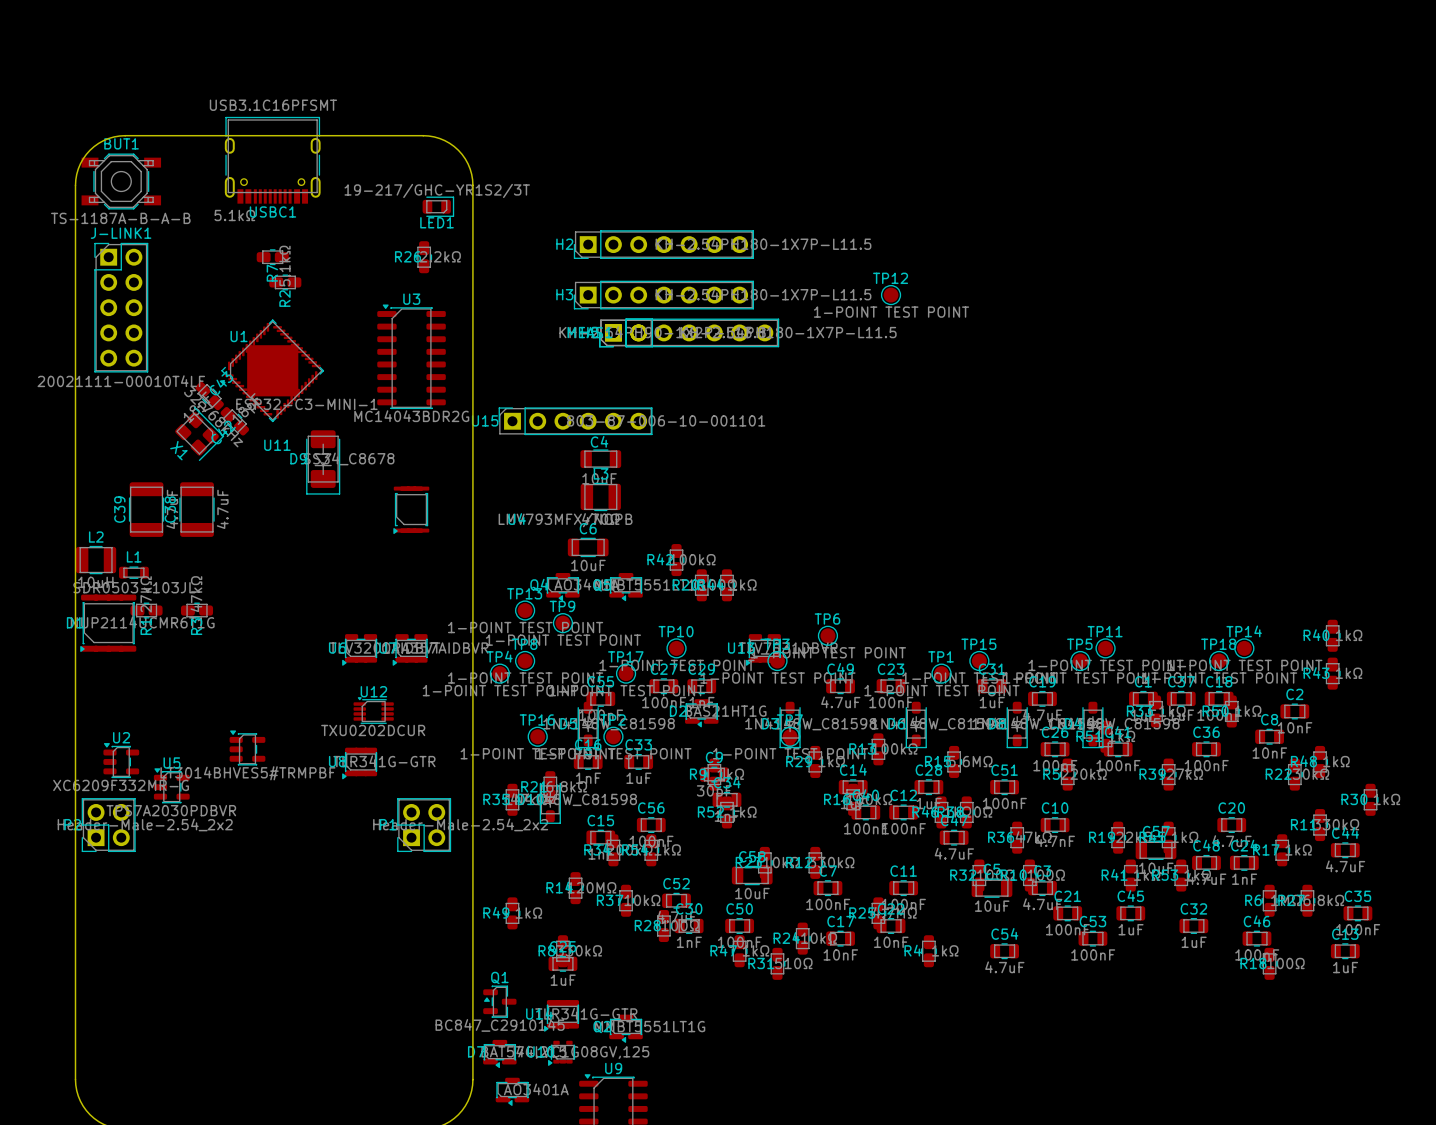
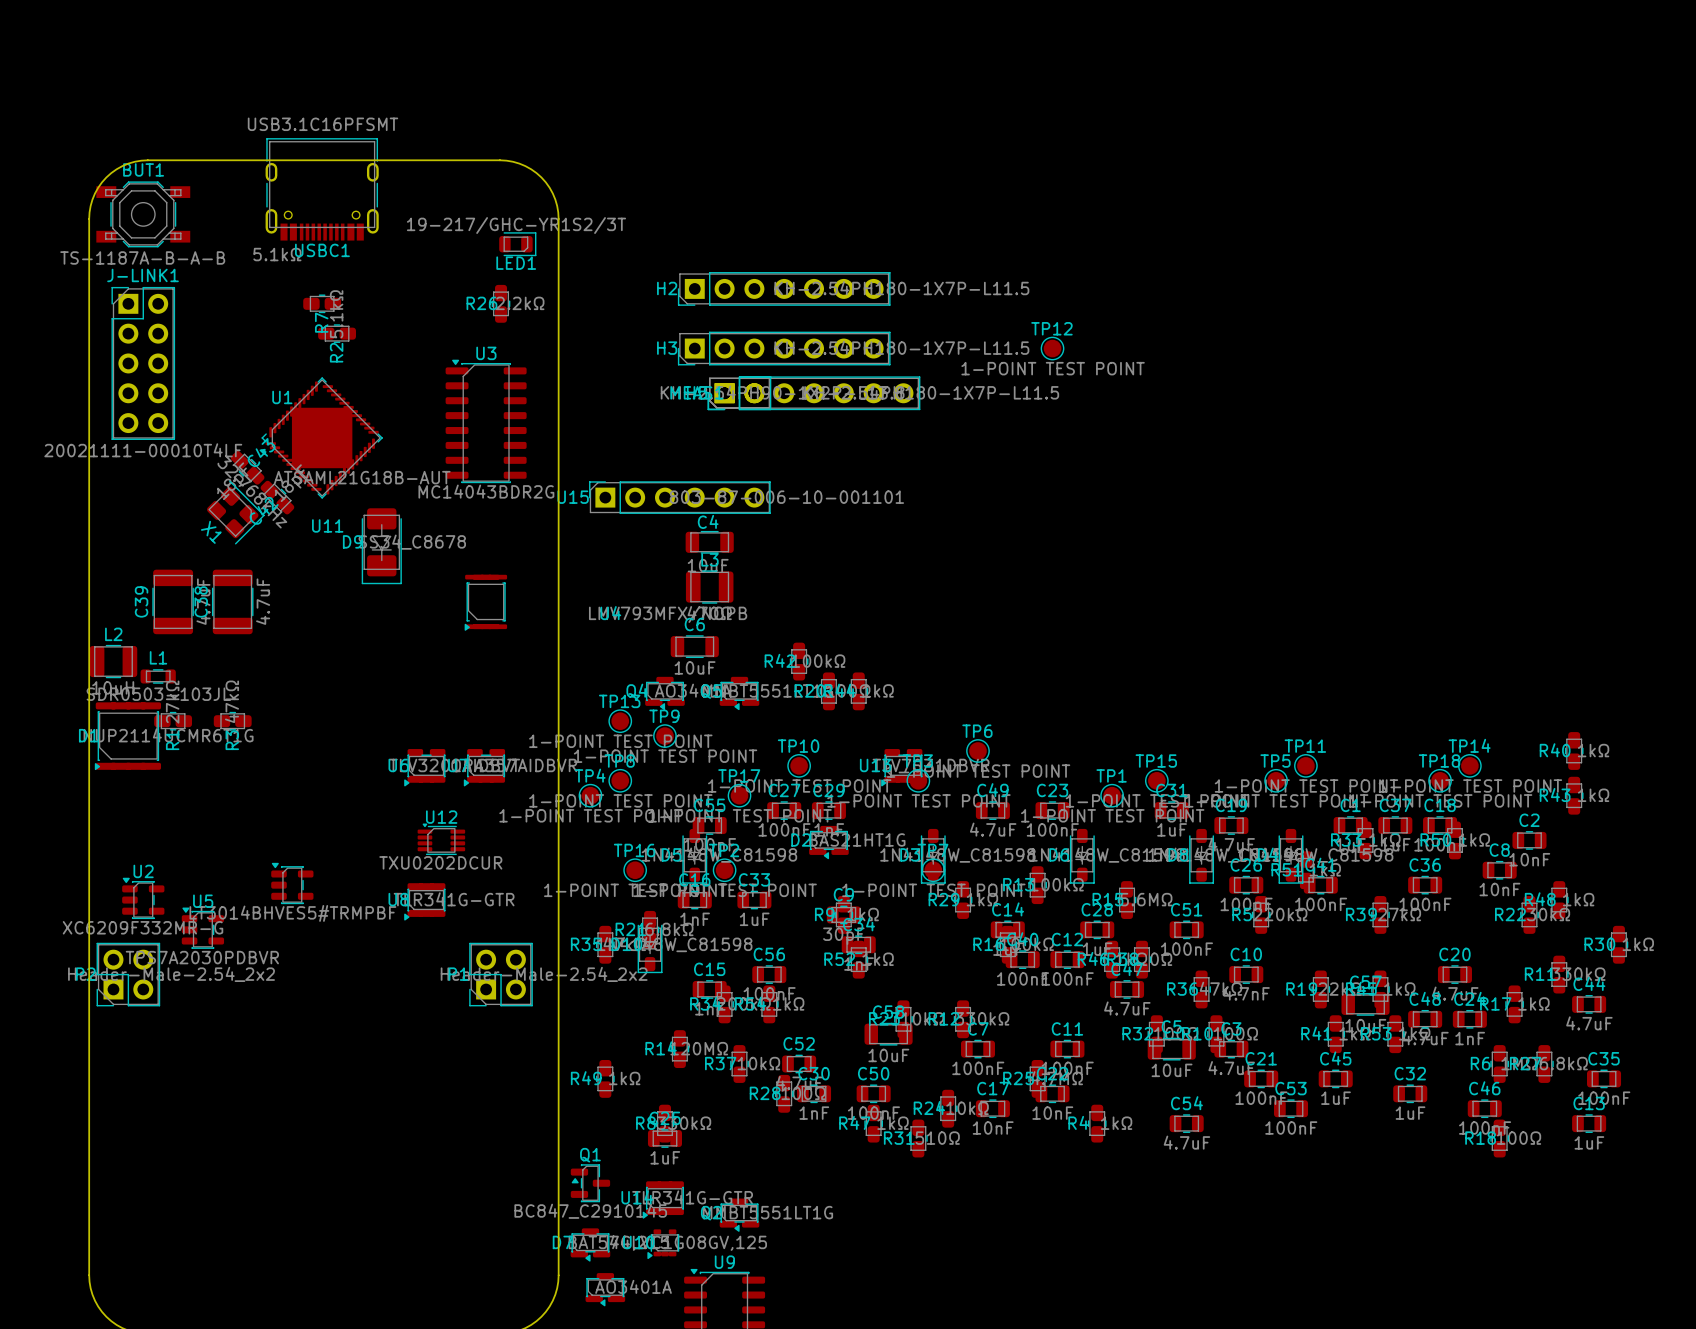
U1 value: ESP32-C3-MINI-1 (306, 404) -> ATSAML21G18B-AUT (362, 477)

